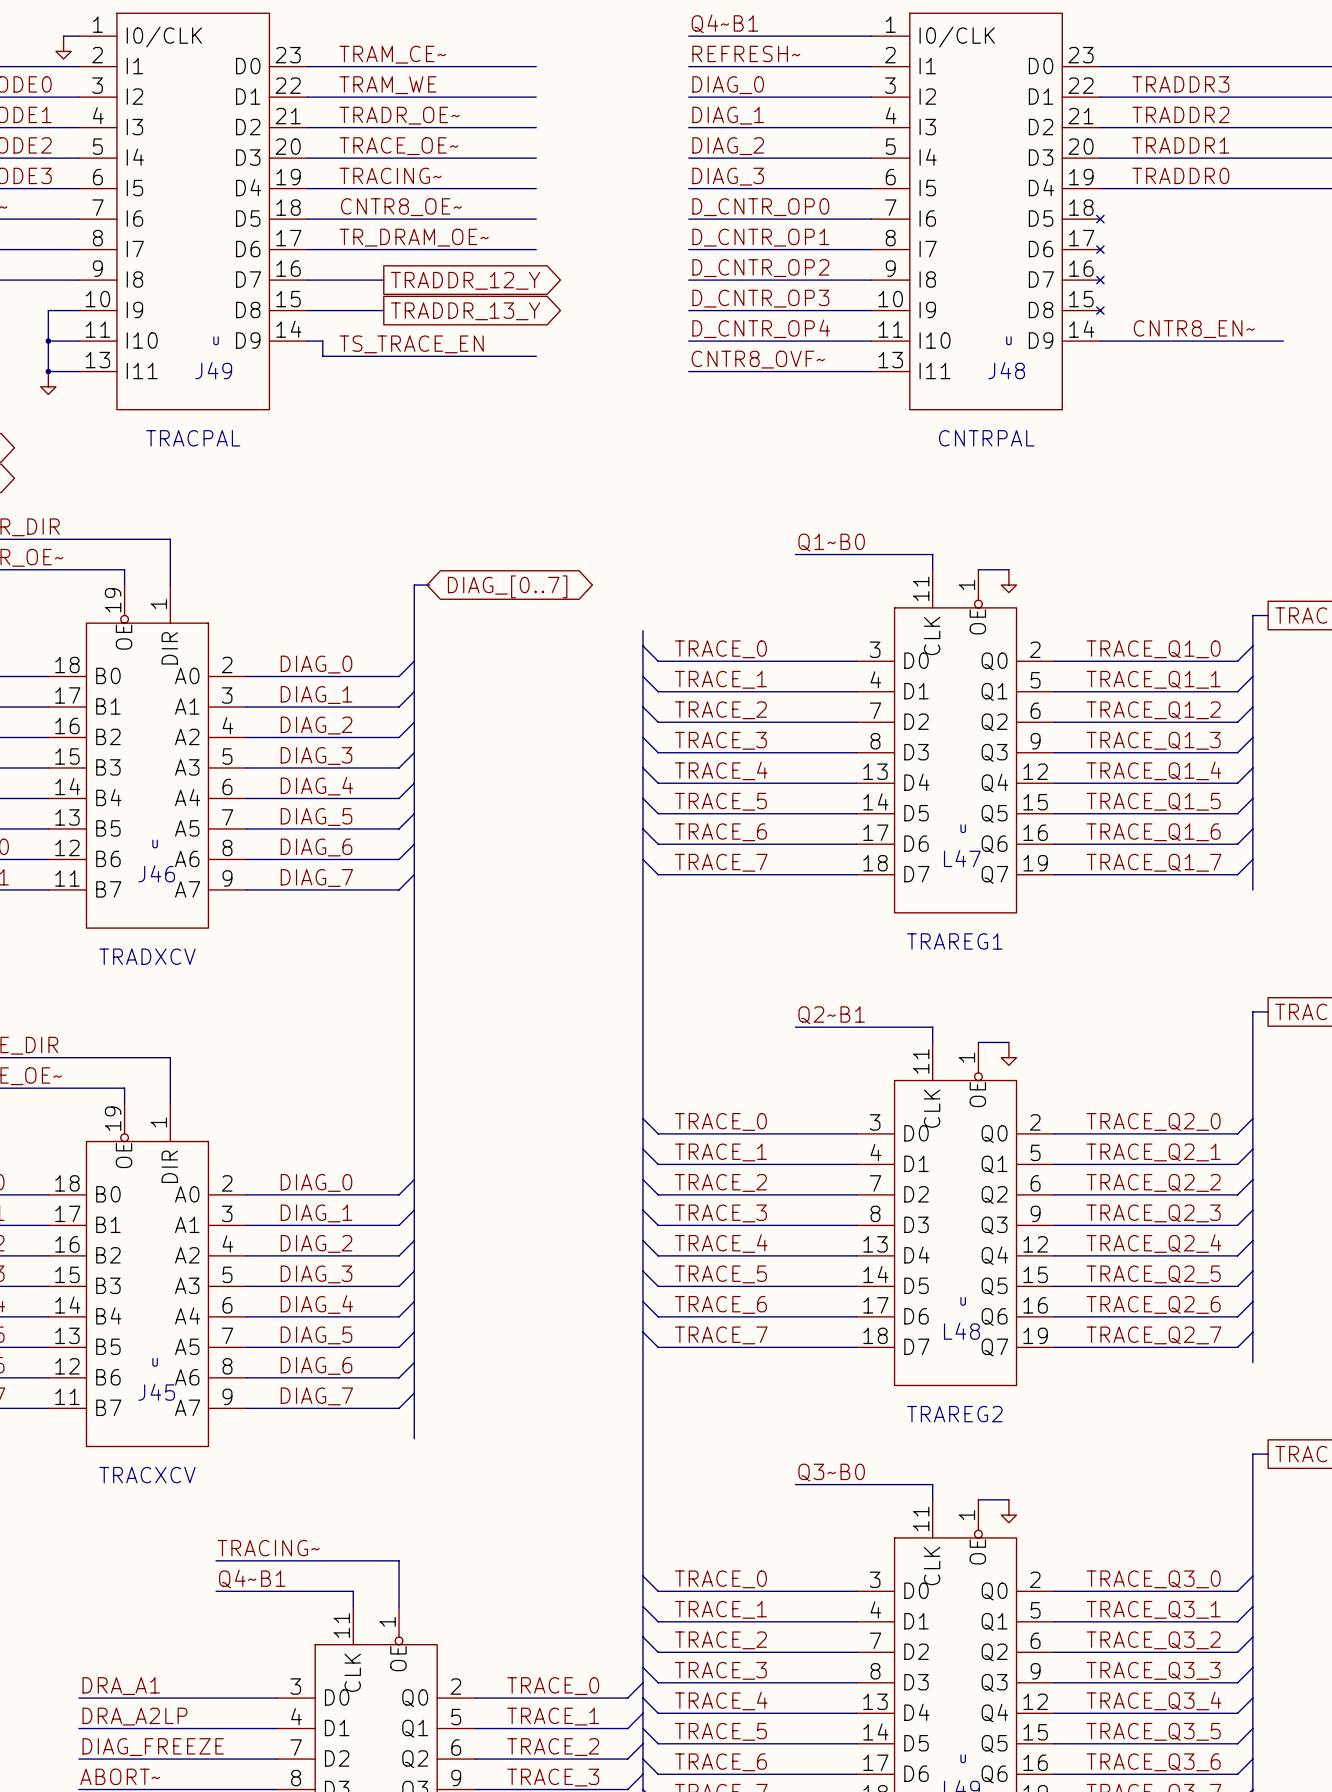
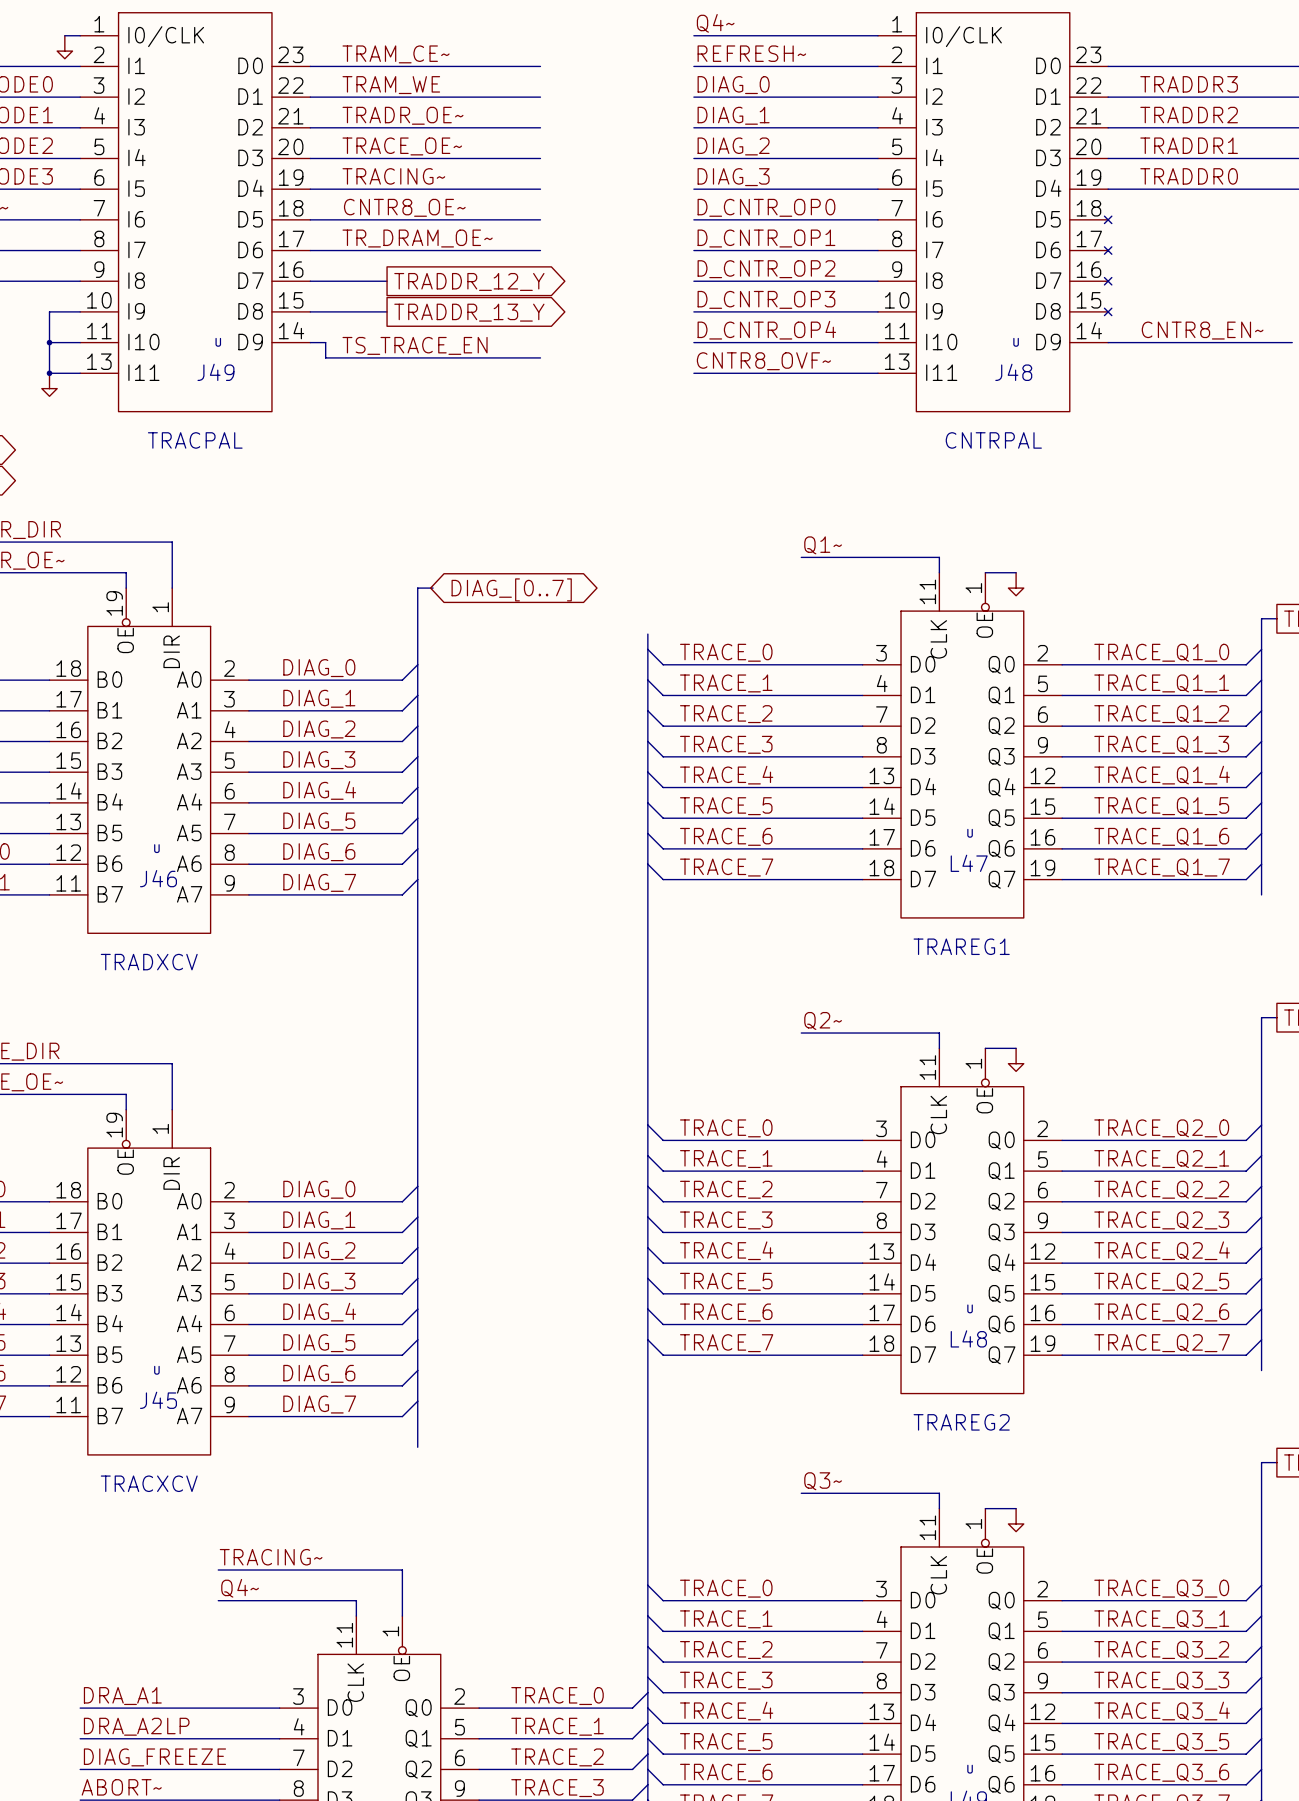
label: Q4~B1 (724, 23) -> Q4~ (715, 23)
label: Q1~B0 (831, 542) -> Q1~ (823, 545)
label: Q2~B1 (831, 1015) -> Q2~ (823, 1020)
label: Q3~B0 (831, 1472) -> Q3~ (823, 1481)
label: Q4~B1 (252, 1578) -> Q4~ (240, 1588)

